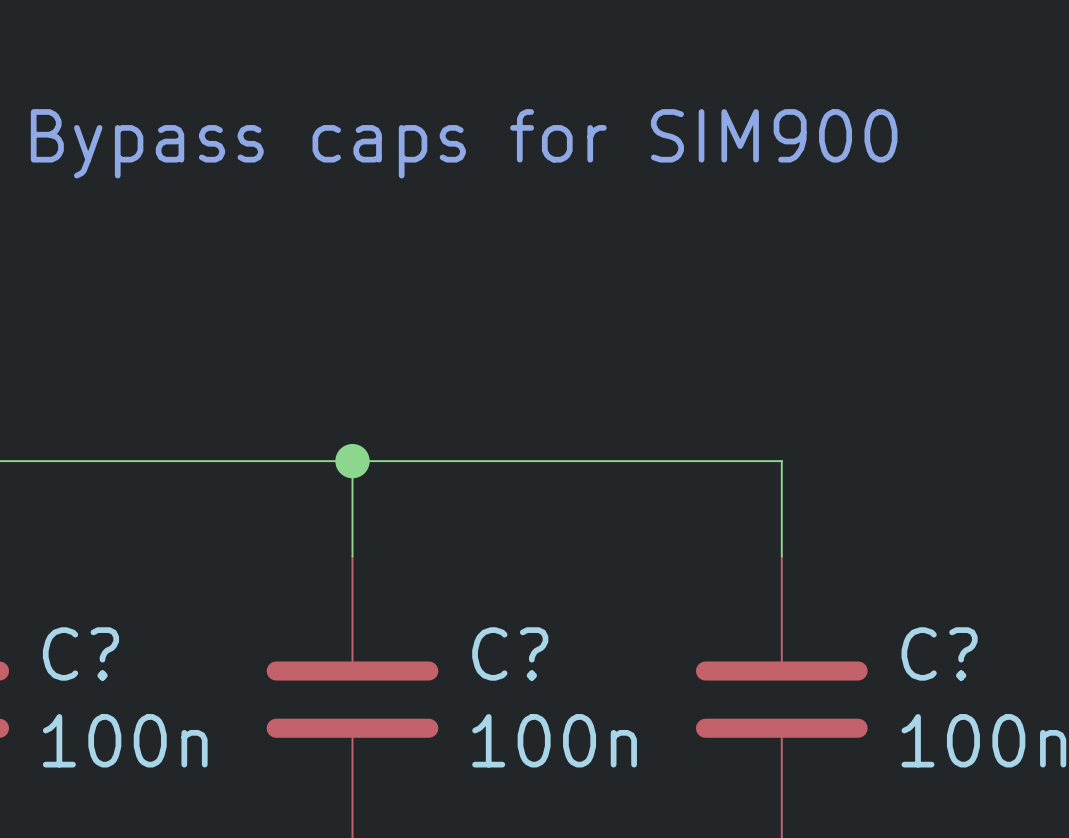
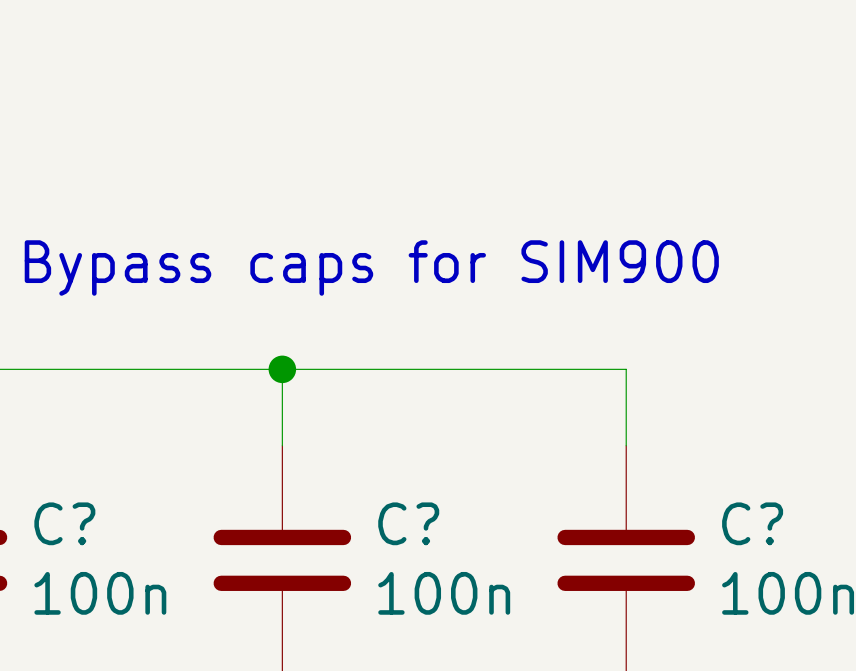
text position: Bypass caps for SIM900 (464, 143) -> Bypass caps for SIM900 (371, 268)

